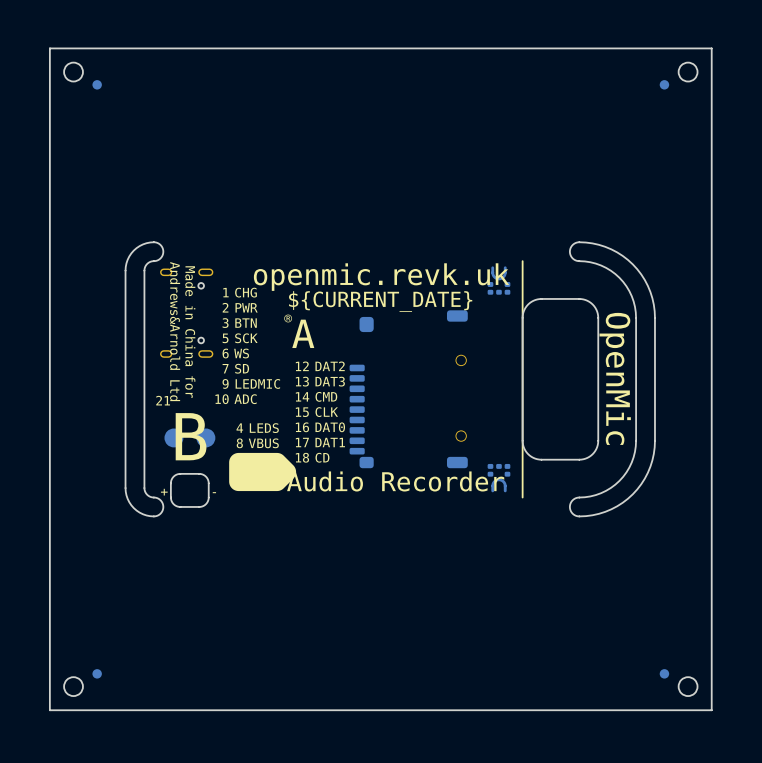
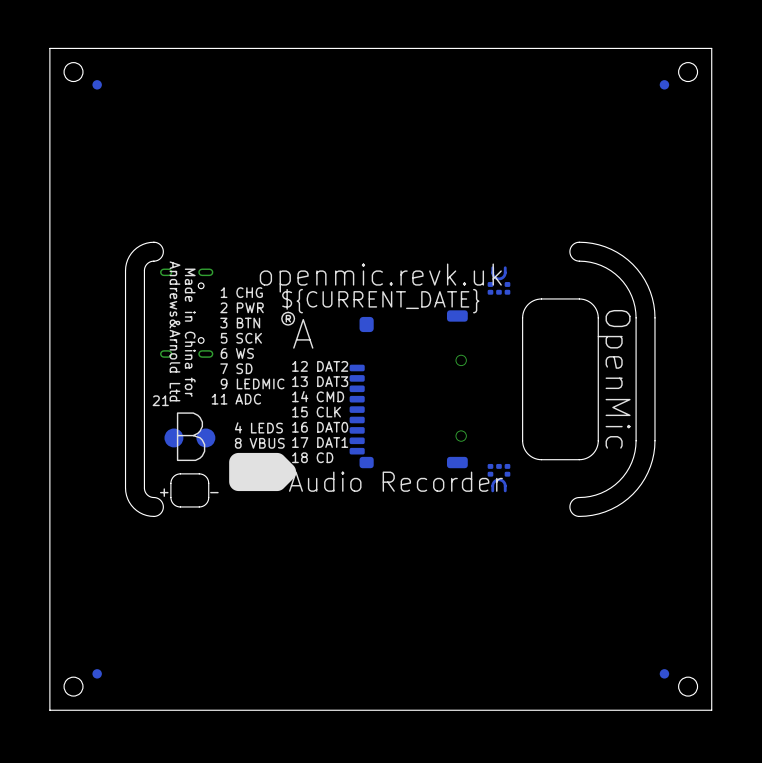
line: (522, 261) (522, 497) -> none
text: 10 (222, 399) -> 11 (219, 399)

